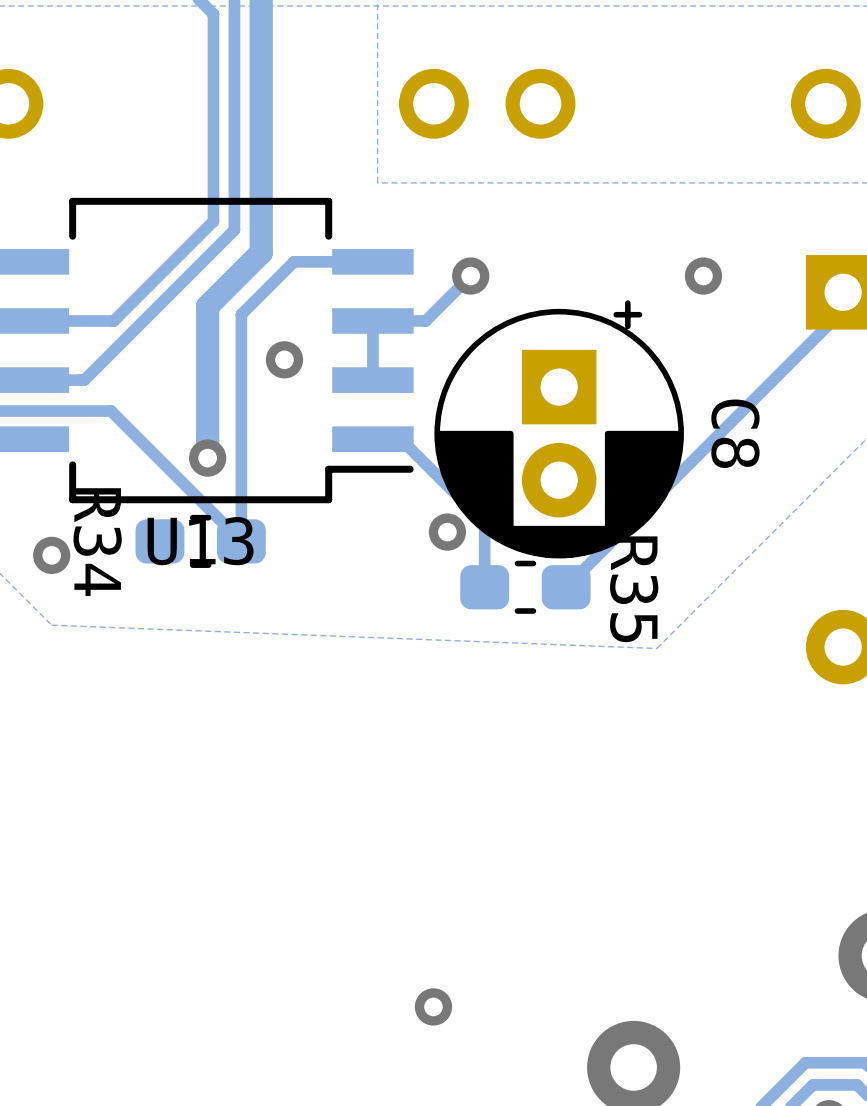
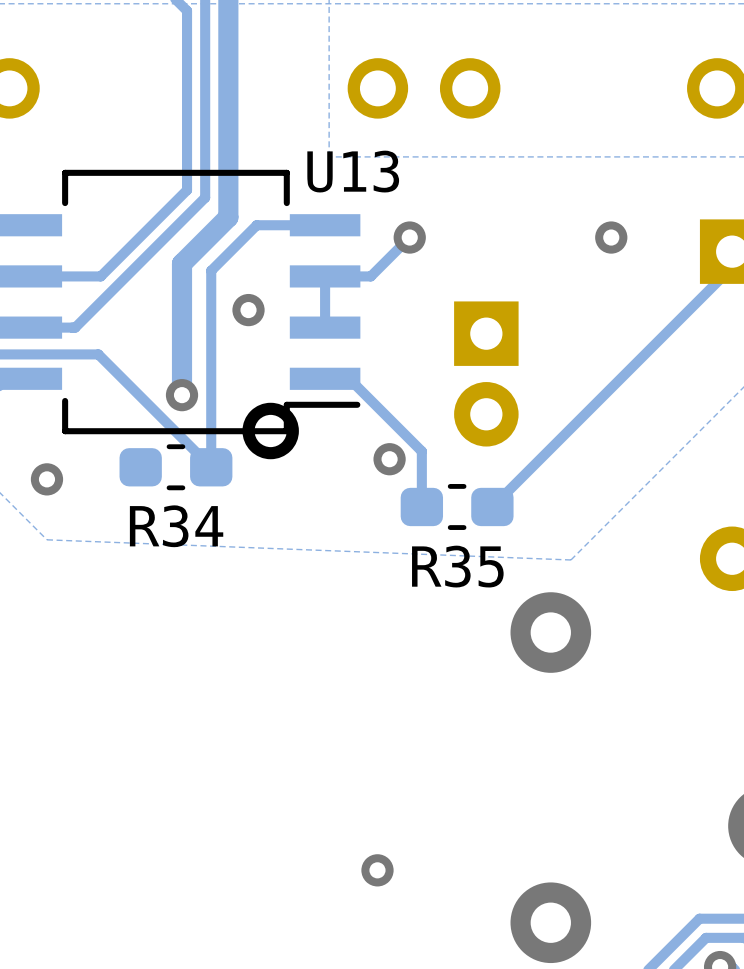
C8 side: bottom (559, 429) -> top (486, 373)
drawing: none -> [242, 402, 299, 460]
U13 name position: U13 (200, 541) -> U13 (353, 171)
R34 name rotation: 0° (97, 542) -> 90° counterclockwise (176, 526)
R35 name rotation: 0° (634, 589) -> 90° counterclockwise (457, 566)
via: none -> (550, 632)

